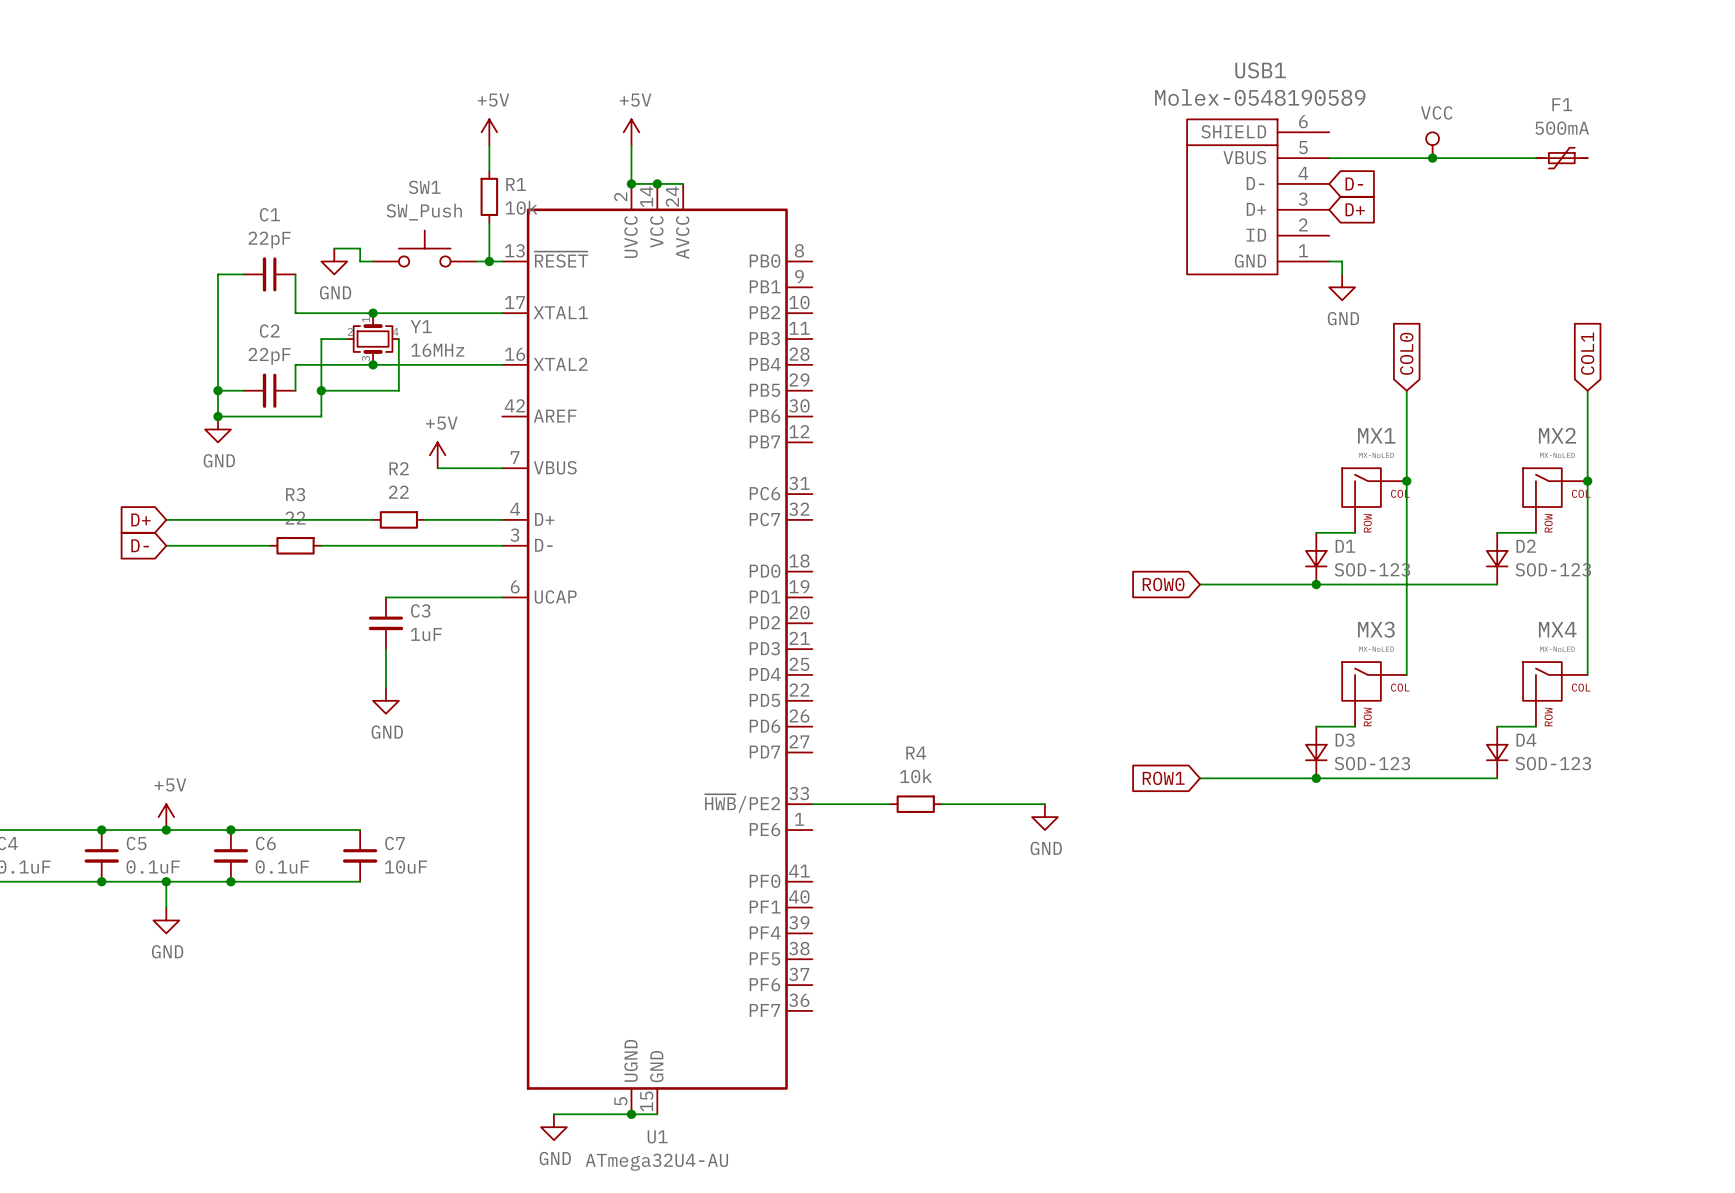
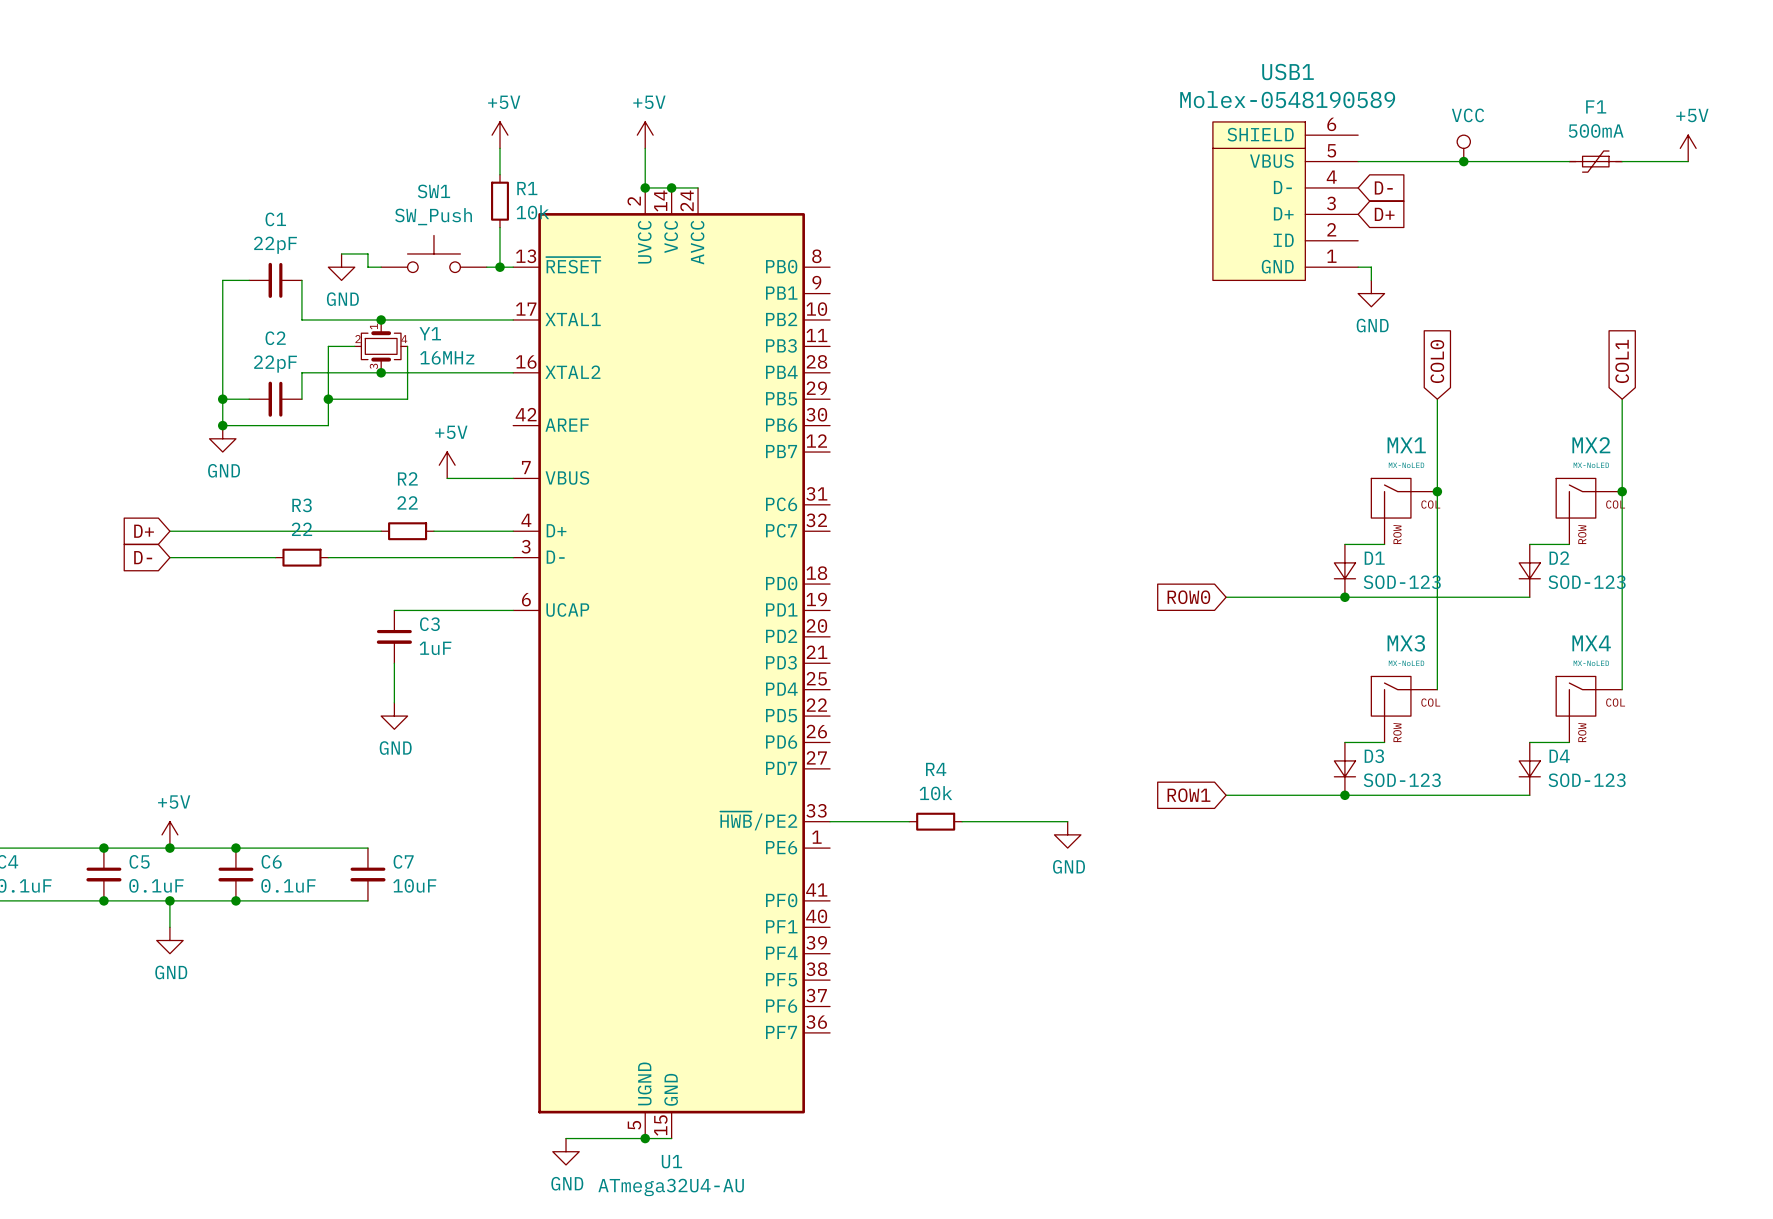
power symbol: none -> +5V (1688, 148)
wire: none -> (1622, 161) (1688, 161)

